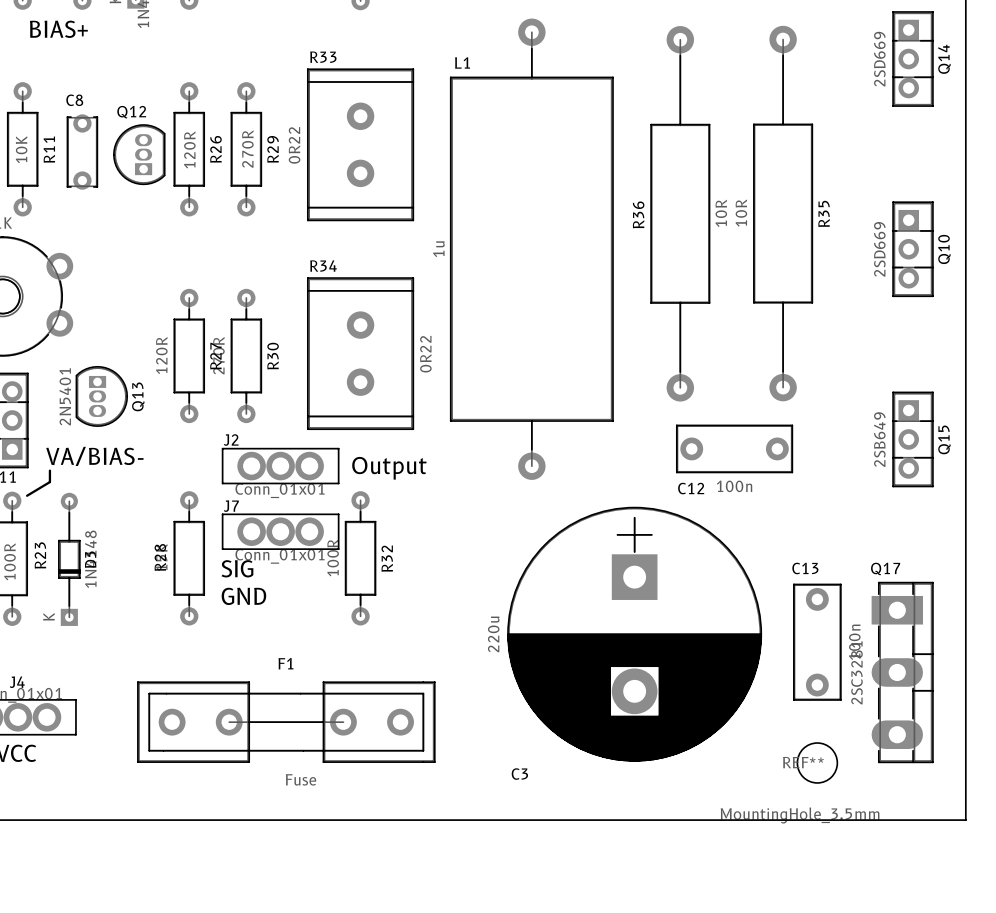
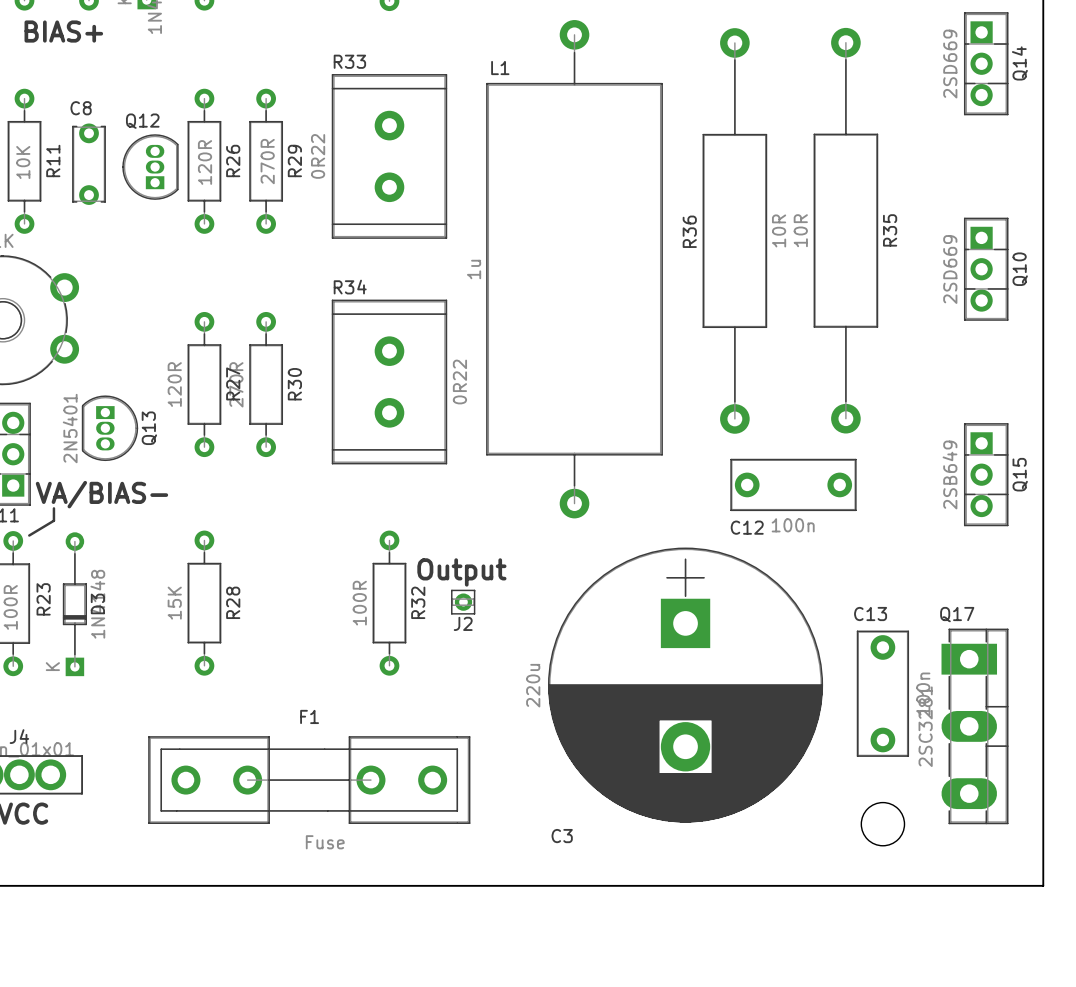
J2 name position: J2 (231, 440) -> J2 (463, 623)
J2 footprint: [221, 447, 340, 485] -> [451, 589, 476, 615]
text position: Output (389, 468) -> Output (461, 572)
J2 value: Conn_01x01 (280, 490) -> none
J7: Conn_01x01 (280, 531) -> none
R28 name position: R28 (160, 557) -> R28 (233, 602)
text: SIG (237, 568) -> none
text: GND (243, 596) -> none
REF** name: REF** (803, 762) -> none
REF** value: MountingHole_3.5mm (800, 815) -> none

